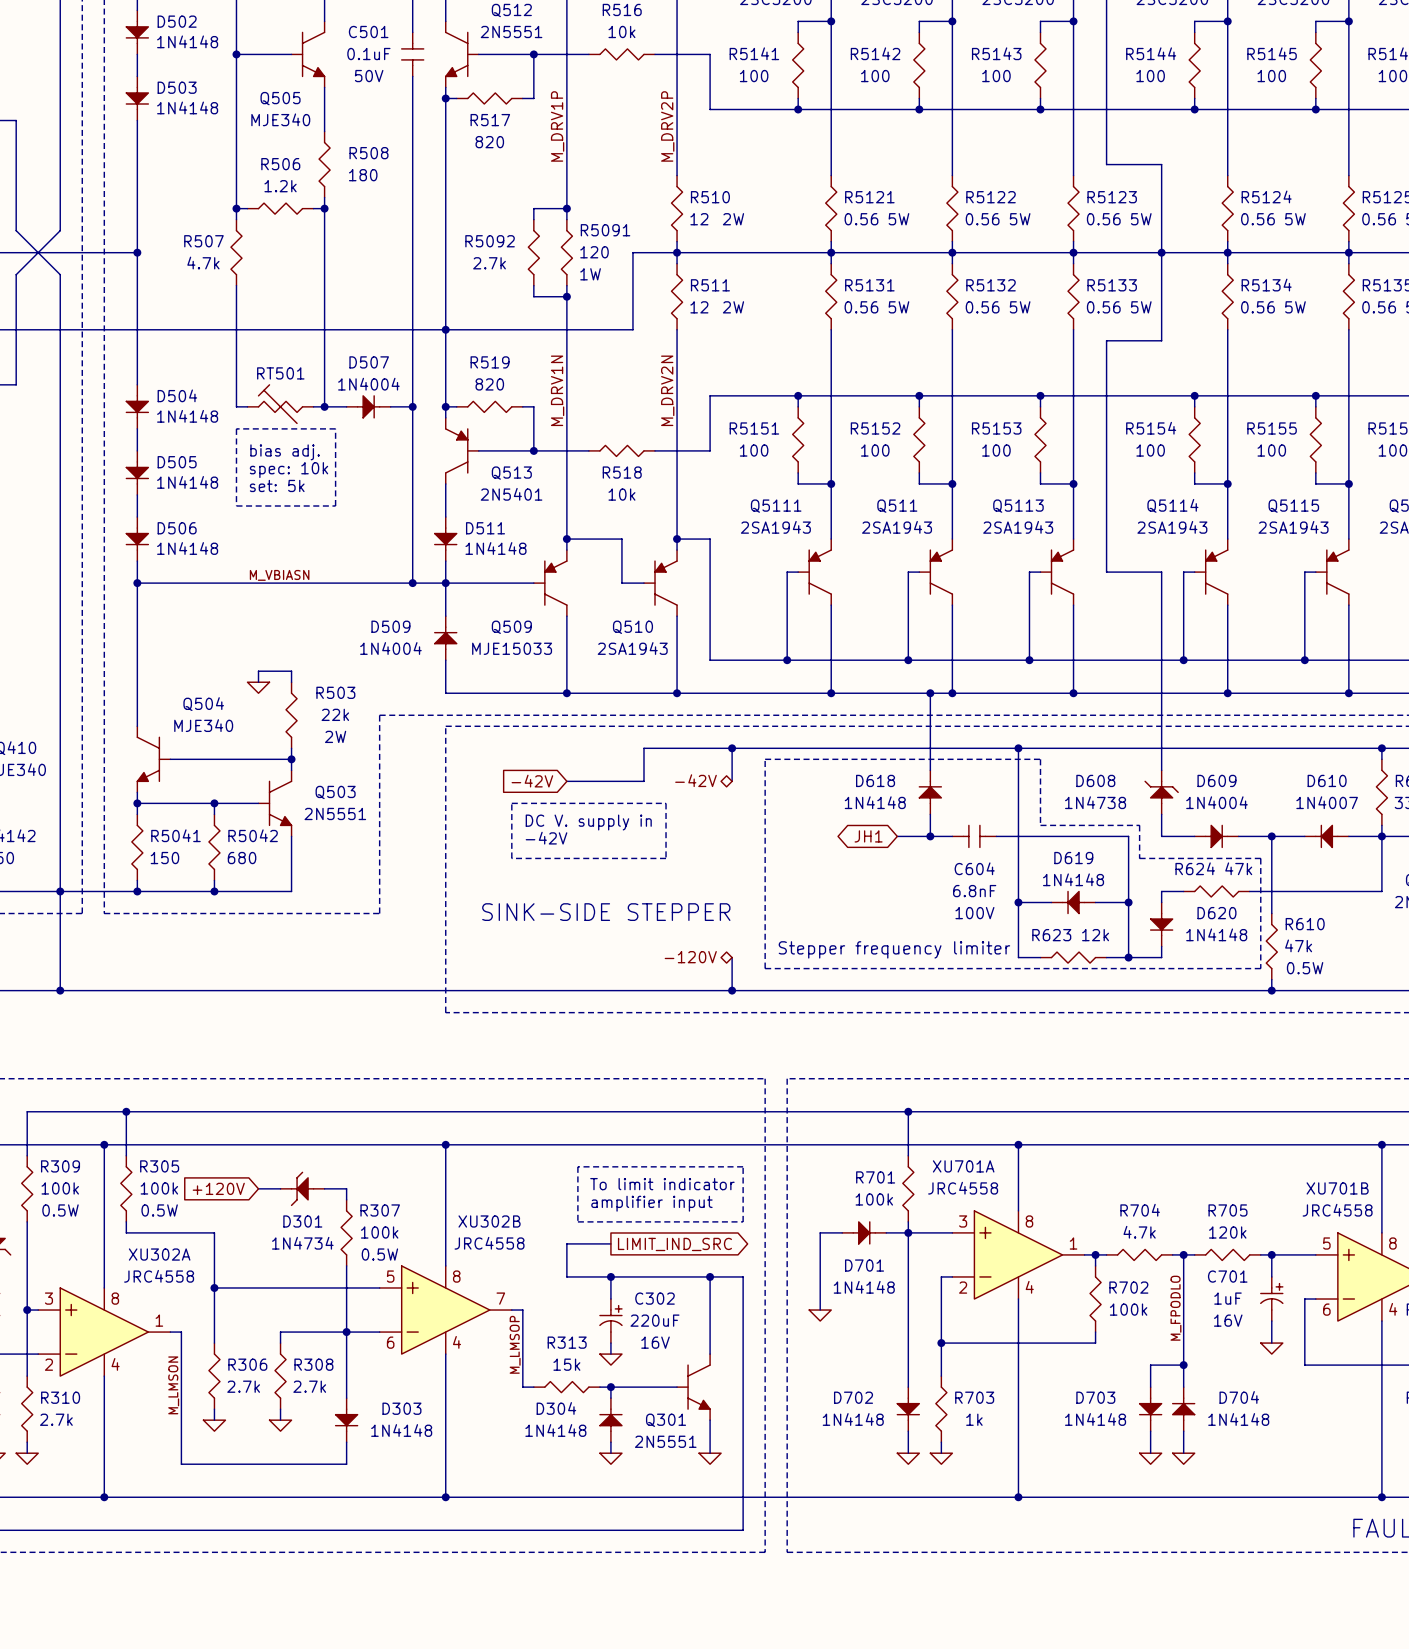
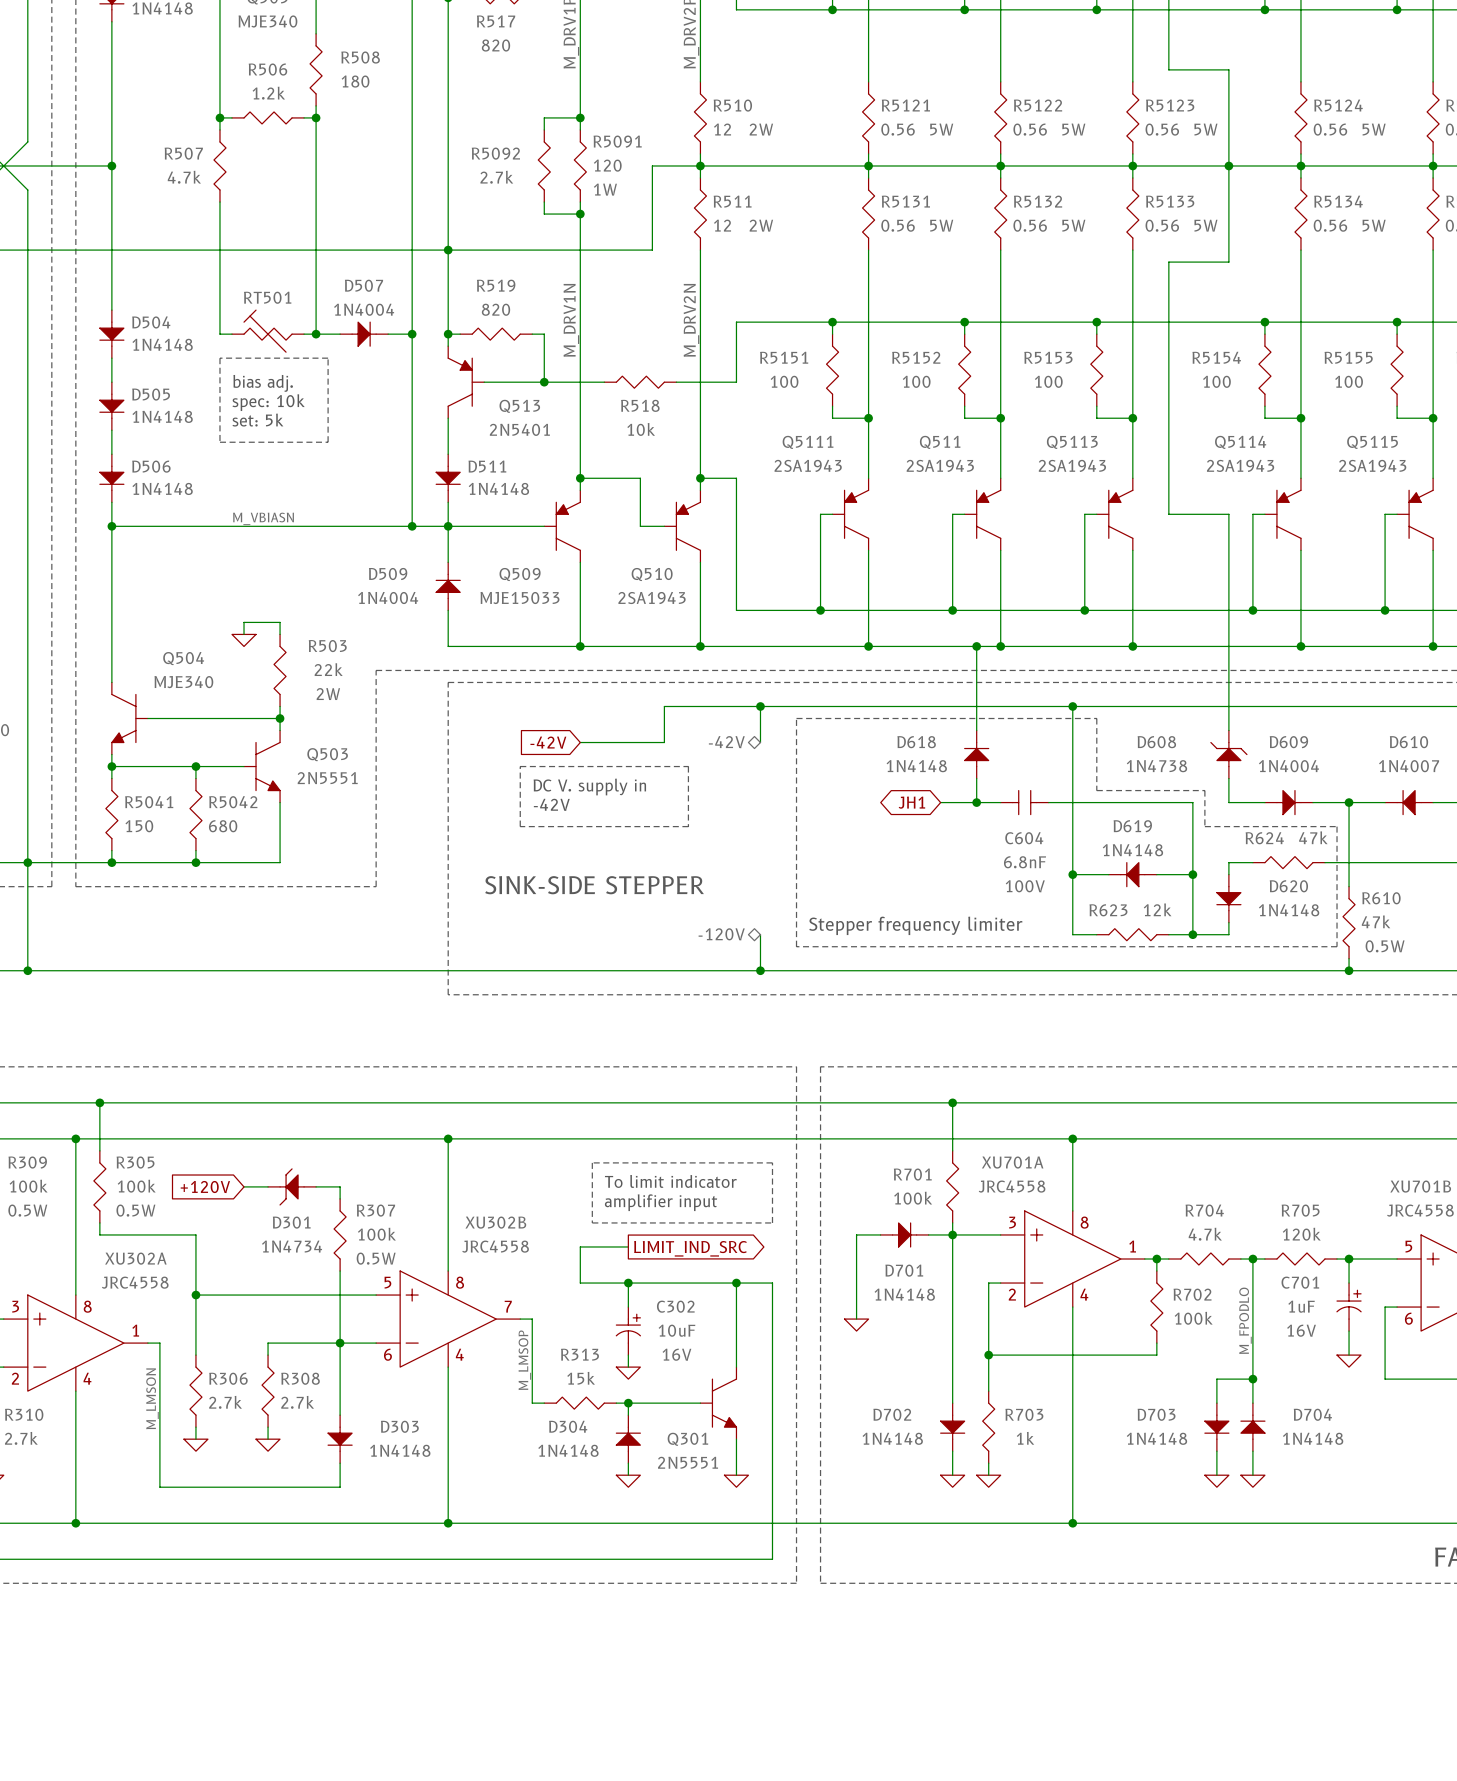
C302 value: 220uF (655, 1320) -> 10uF (676, 1330)

